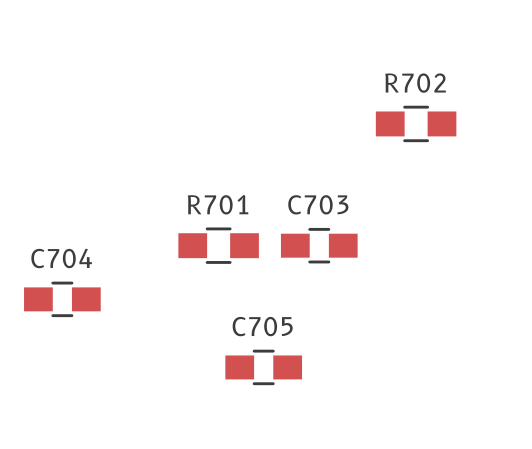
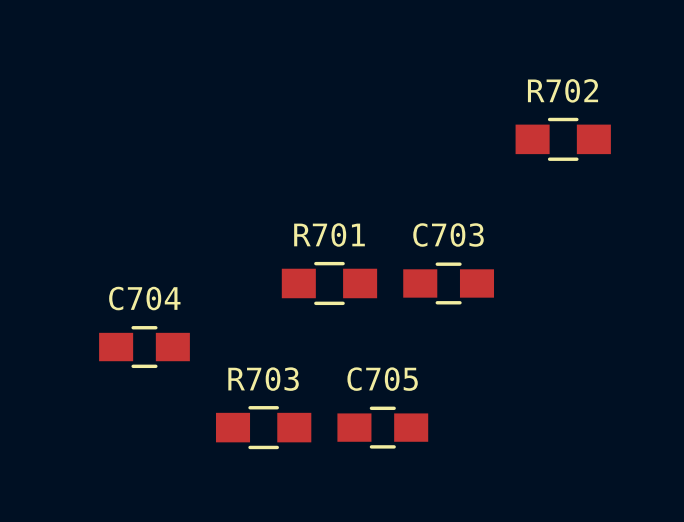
R703: none -> (263, 427)

